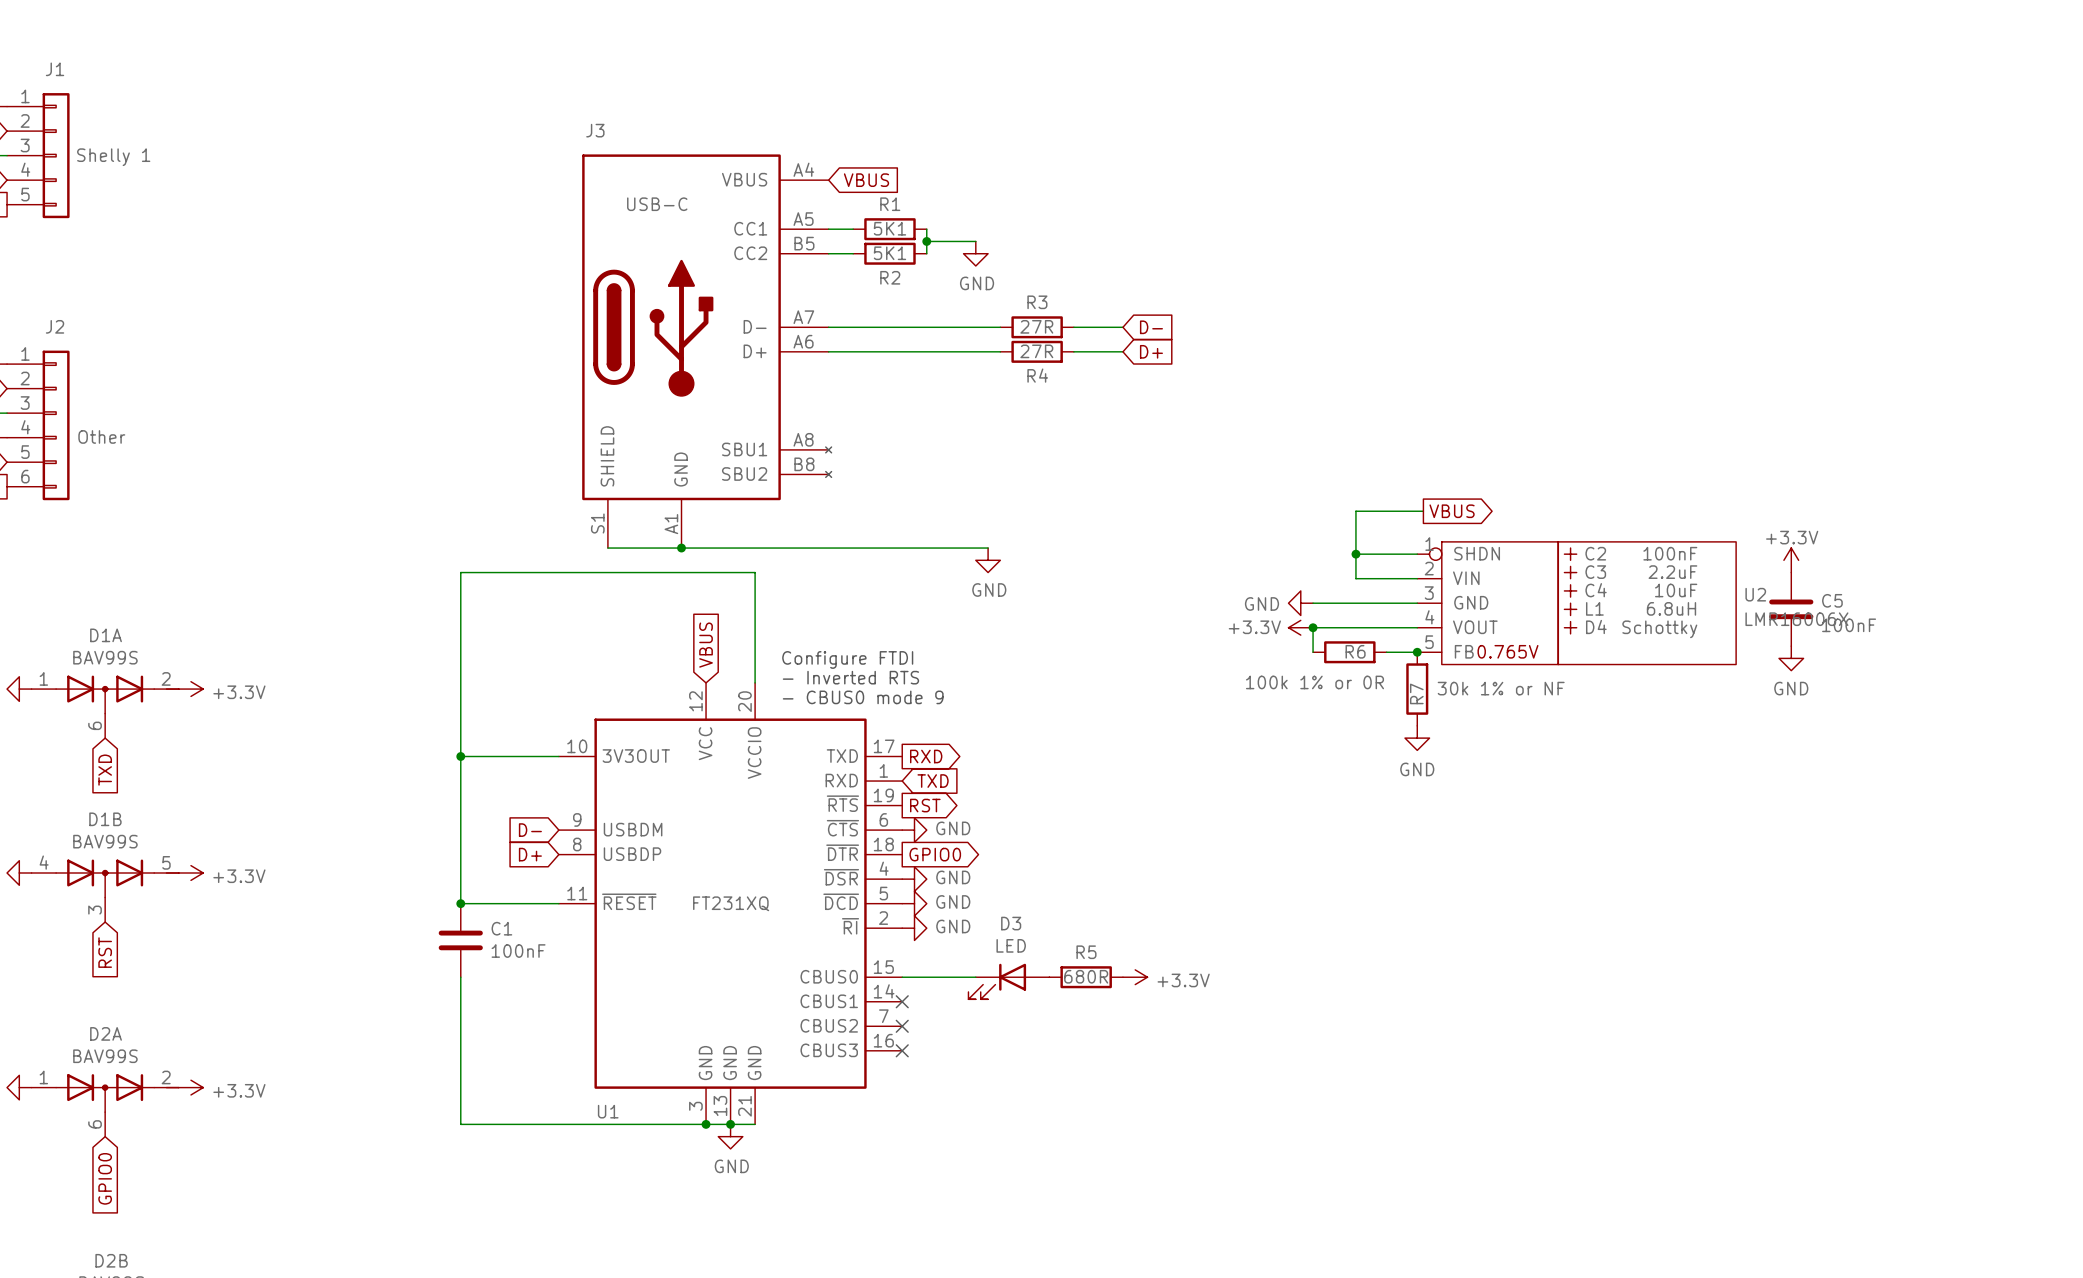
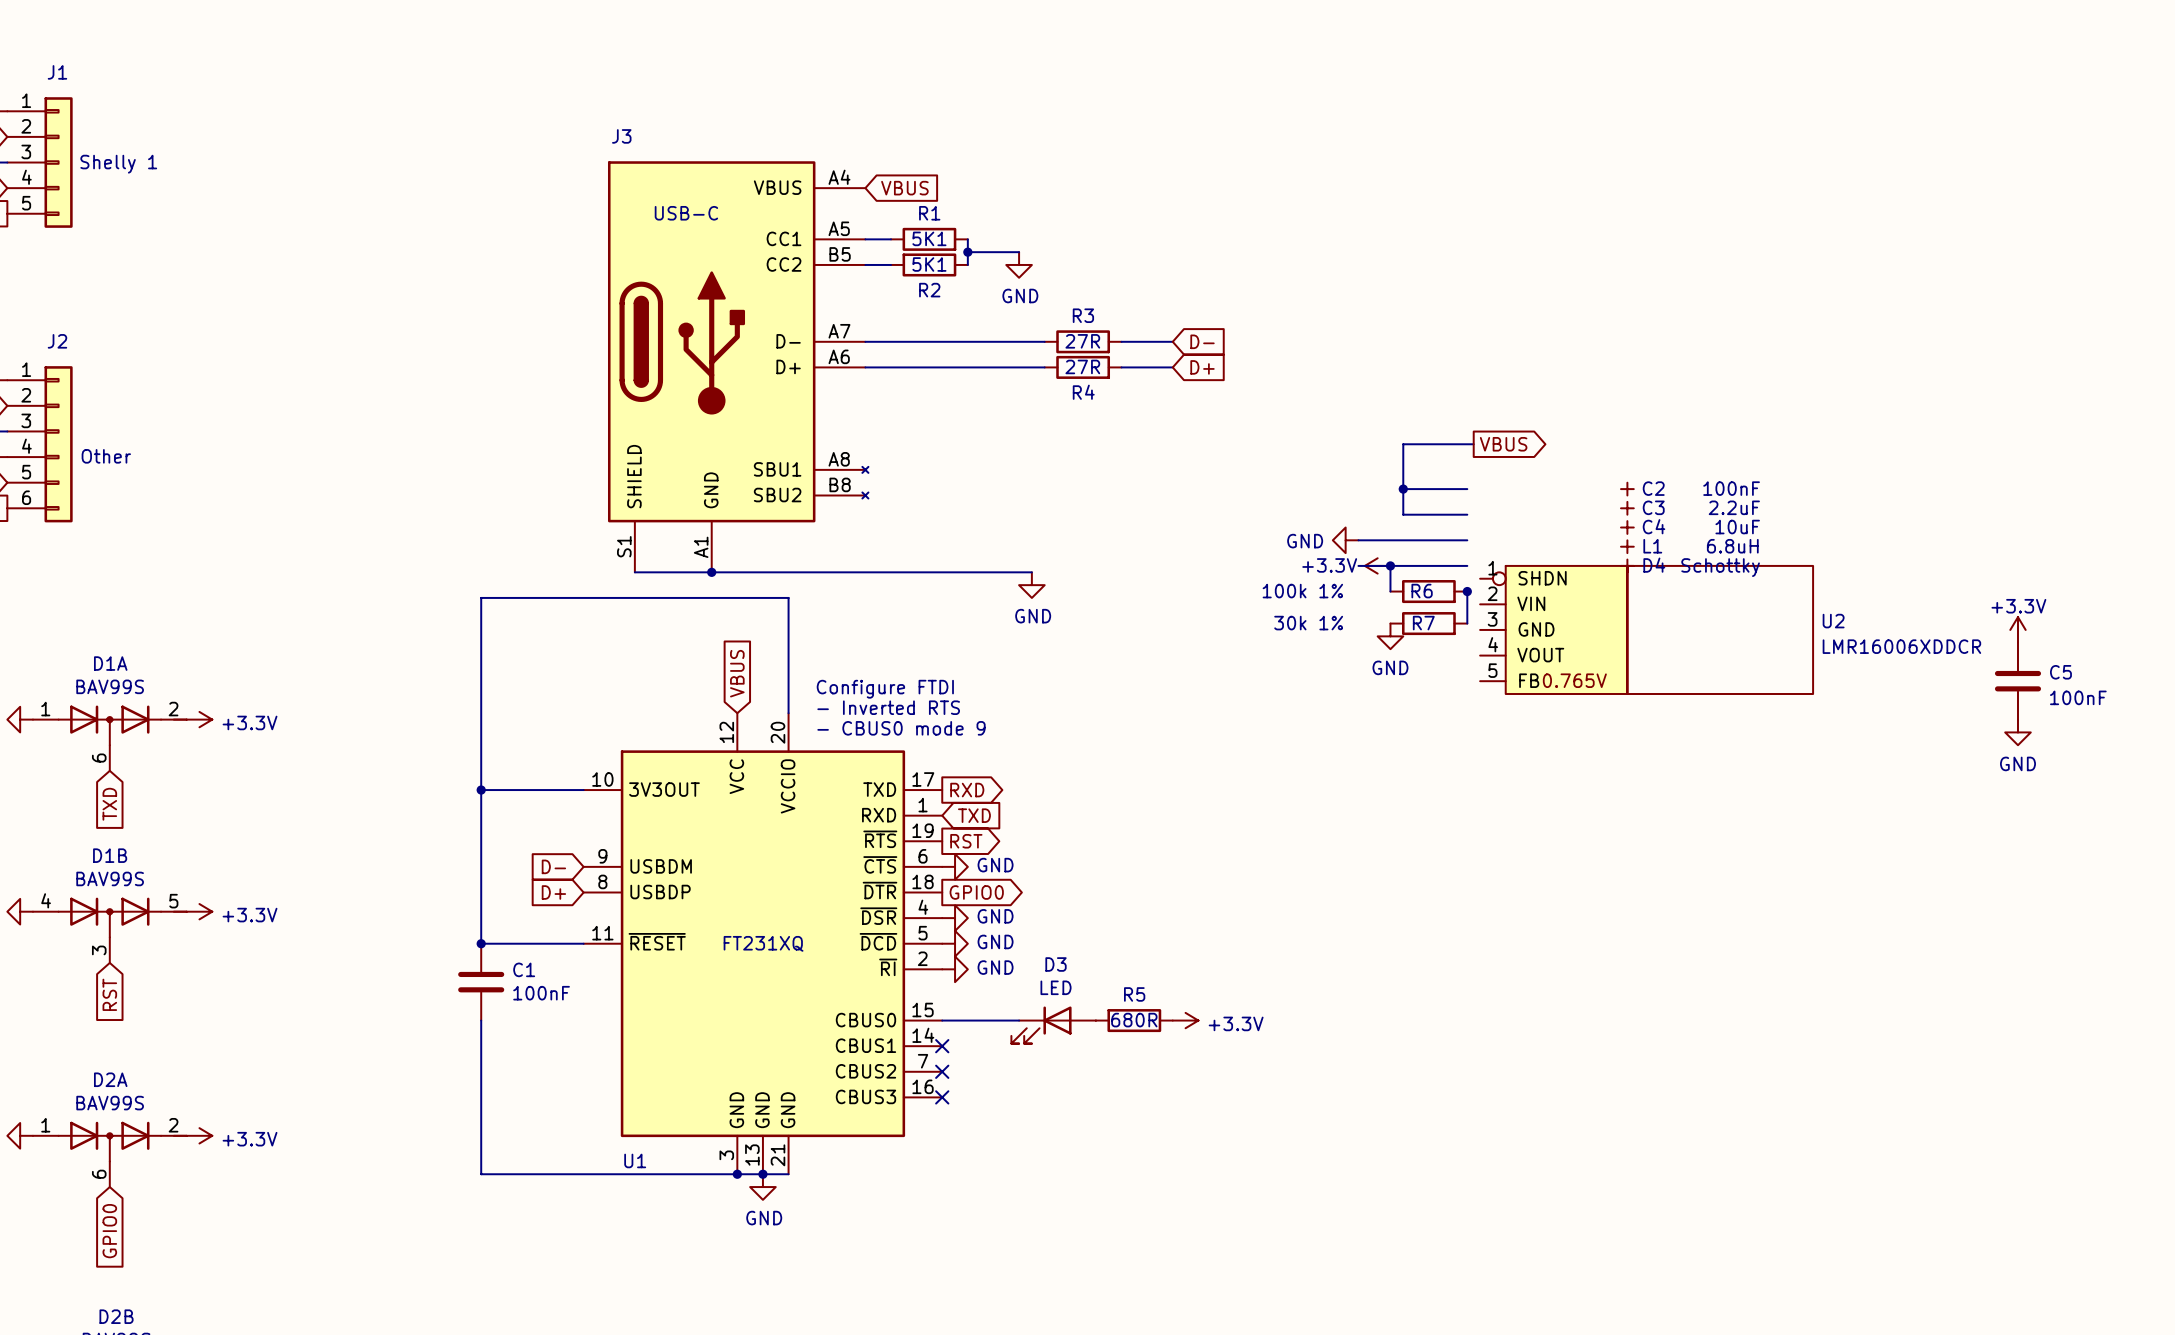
junction: none -> (1403, 489)
wire: (1423, 511) (1355, 511) (1355, 578) (1417, 578) -> (1473, 444) (1403, 444) (1403, 514) (1467, 514)
global label position: VBUS (1452, 511) -> VBUS (1503, 444)
power symbol: none -> GND (1345, 540)
wire: none -> (1358, 565) (1467, 565)
wire: none -> (1390, 565) (1390, 591)
junction: none -> (1390, 565)
wire: (1355, 554) (1417, 554) -> (1403, 489) (1467, 489)
junction: (1355, 554) -> none
C2 position: (1570, 554) -> (1627, 489)
power symbol position: +3.3V (1791, 560) -> +3.3V (2017, 629)
wire: none -> (1467, 591) (1467, 623)
junction: none -> (1467, 591)
C3 position: (1570, 572) -> (1627, 508)
C4 position: (1570, 590) -> (1627, 527)
power symbol rotation: 0° (1300, 603) -> 90° counterclockwise (1390, 636)
power symbol position: GND (1300, 603) -> GND (1390, 636)
wire: (1313, 603) (1417, 603) -> (1358, 540) (1467, 540)
L1 position: (1570, 609) -> (1627, 546)
C5 position: (1791, 609) -> (2017, 681)
U2 value: LMR16006X (1796, 619) -> LMR16006XDDCR (1901, 646)
power symbol position: +3.3V (1300, 627) -> +3.3V (1377, 565)
junction: (1313, 627) -> none
wire: (1417, 627) (1313, 627) (1313, 652) -> none
D4 position: (1570, 627) -> (1627, 565)
R6 name position: R6 (1355, 651) -> R6 (1422, 591)
R6 position: (1349, 652) -> (1428, 591)
wire: (1386, 652) (1417, 652) -> none
junction: (1417, 652) -> none
power symbol position: GND (1791, 658) -> GND (2017, 732)
R6 value: 100k 1% or 0R (1314, 682) -> 100k 1% (1302, 591)
R7 value: 30k 1% or NF (1501, 688) -> 30k 1% (1308, 623)
R7 rotation: 0° (1417, 689) -> 90° clockwise (1428, 623)
R7 position: (1417, 689) -> (1428, 623)
power symbol: GND (1417, 738) -> none

